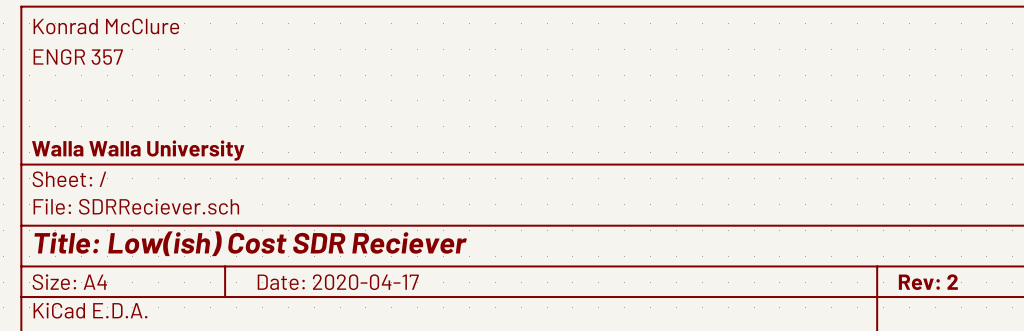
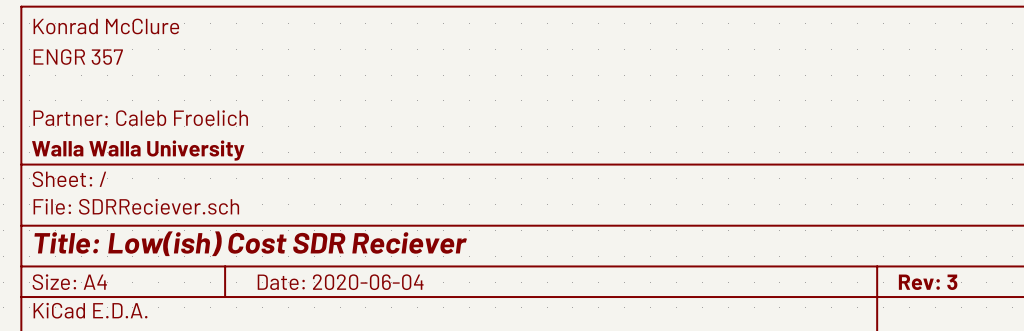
title block: none -> Partner: Caleb Froelich (140, 118)
title block: Date: 2020-04-17 (338, 282) -> Date: 2020-06-04 (340, 282)
title block: Rev: 2 (928, 282) -> Rev: 3 (928, 282)

